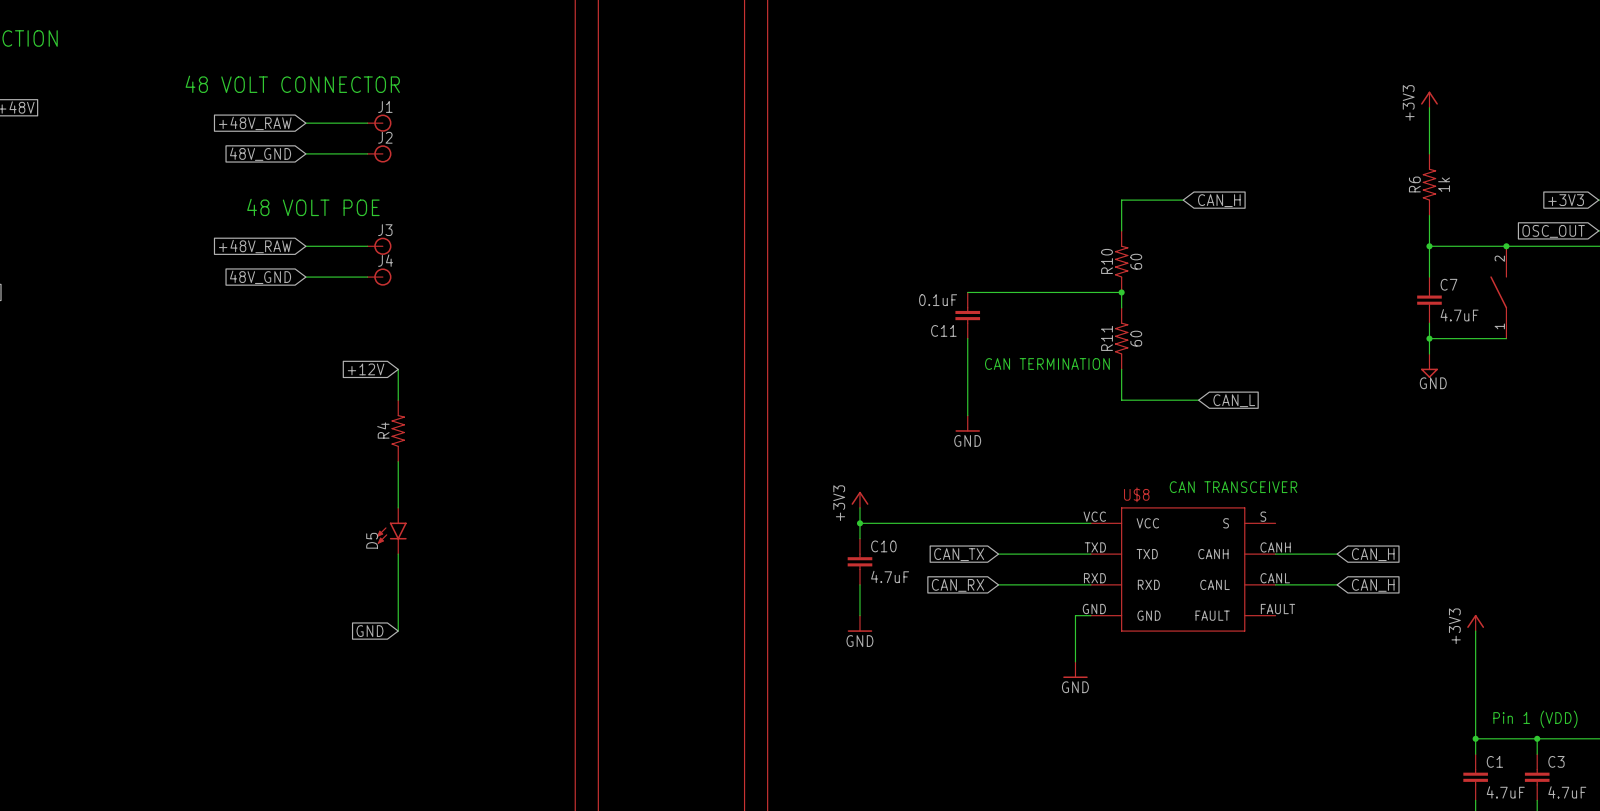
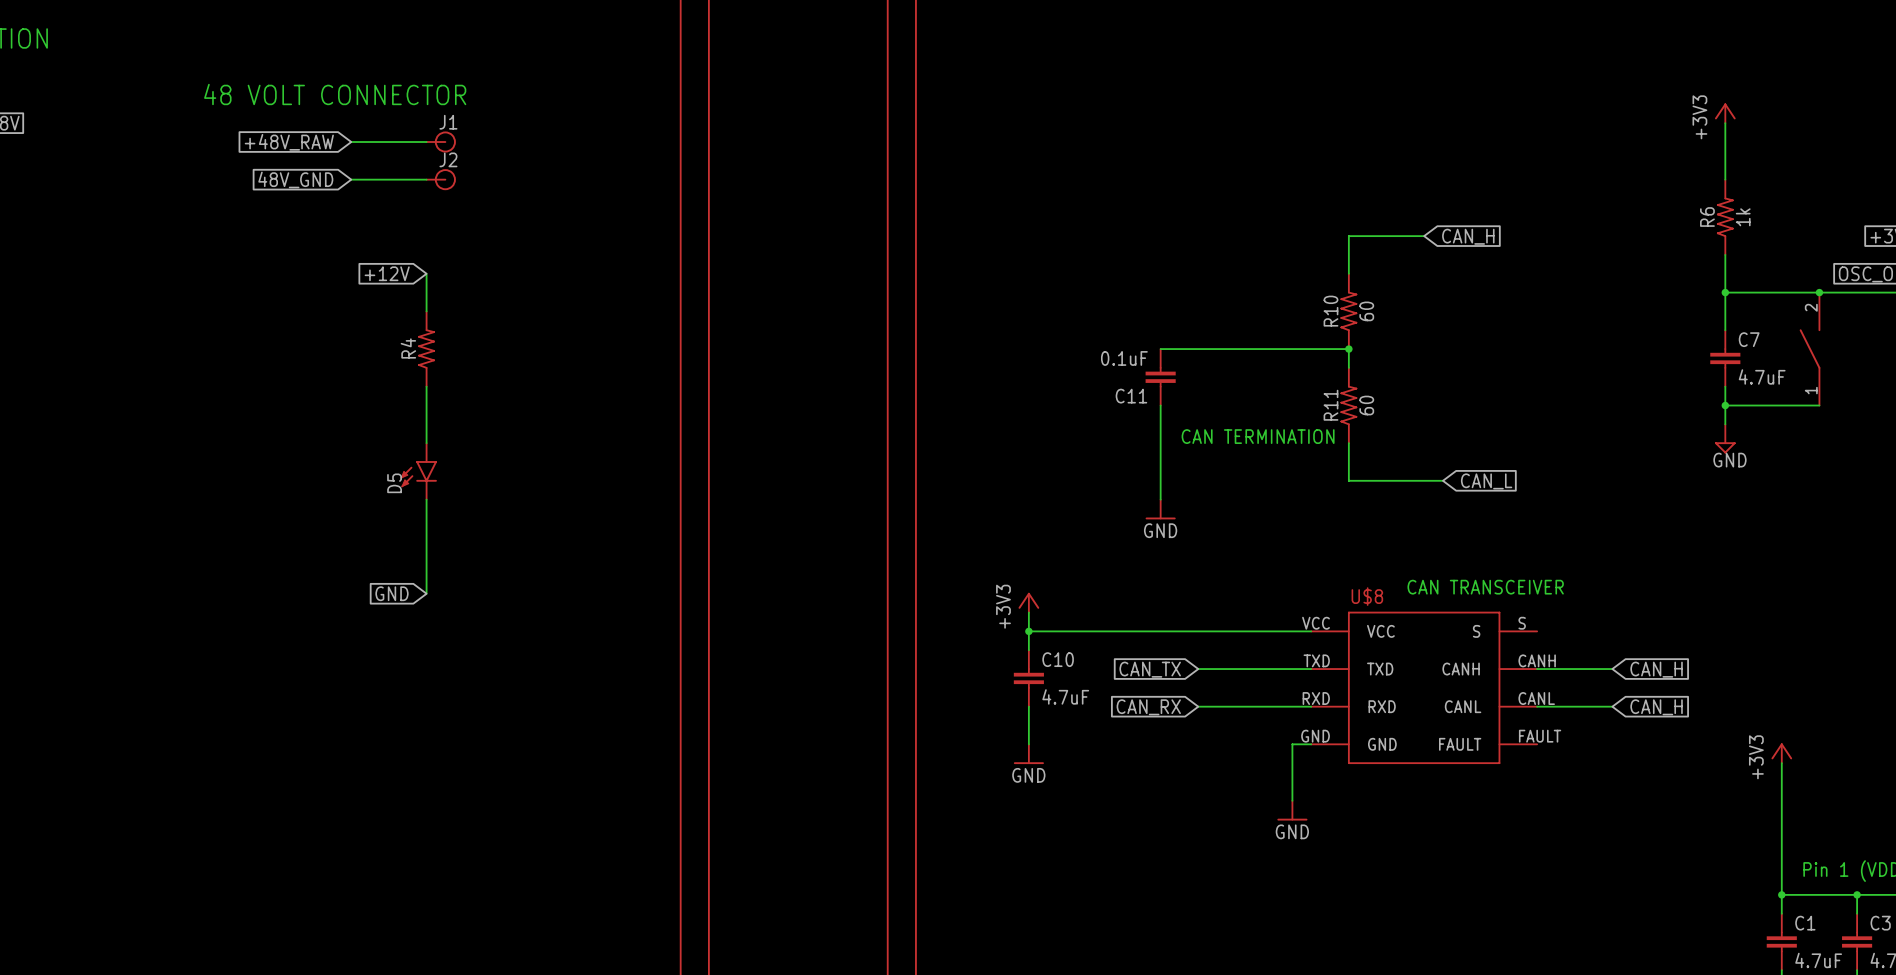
text: 48 VOLT POE (313, 207) -> none
global label: +48V_RAW (255, 246) -> none
wire: (305, 246) (367, 246) -> none
J3: (379, 246) -> none
global label: 48V_GND (260, 277) -> none
wire: (305, 277) (367, 277) -> none
J4: (379, 277) -> none
global label position: +12V (366, 369) -> +12V (387, 273)
wire: (398, 369) (398, 400) -> (426, 273) (426, 311)
R4 position: (398, 430) -> (426, 349)
wire: (398, 461) (398, 507) -> (426, 386) (426, 443)
D5 position: (391, 531) -> (418, 471)
wire: (398, 554) (398, 631) -> (426, 499) (426, 593)
global label position: GND (369, 631) -> GND (391, 593)

